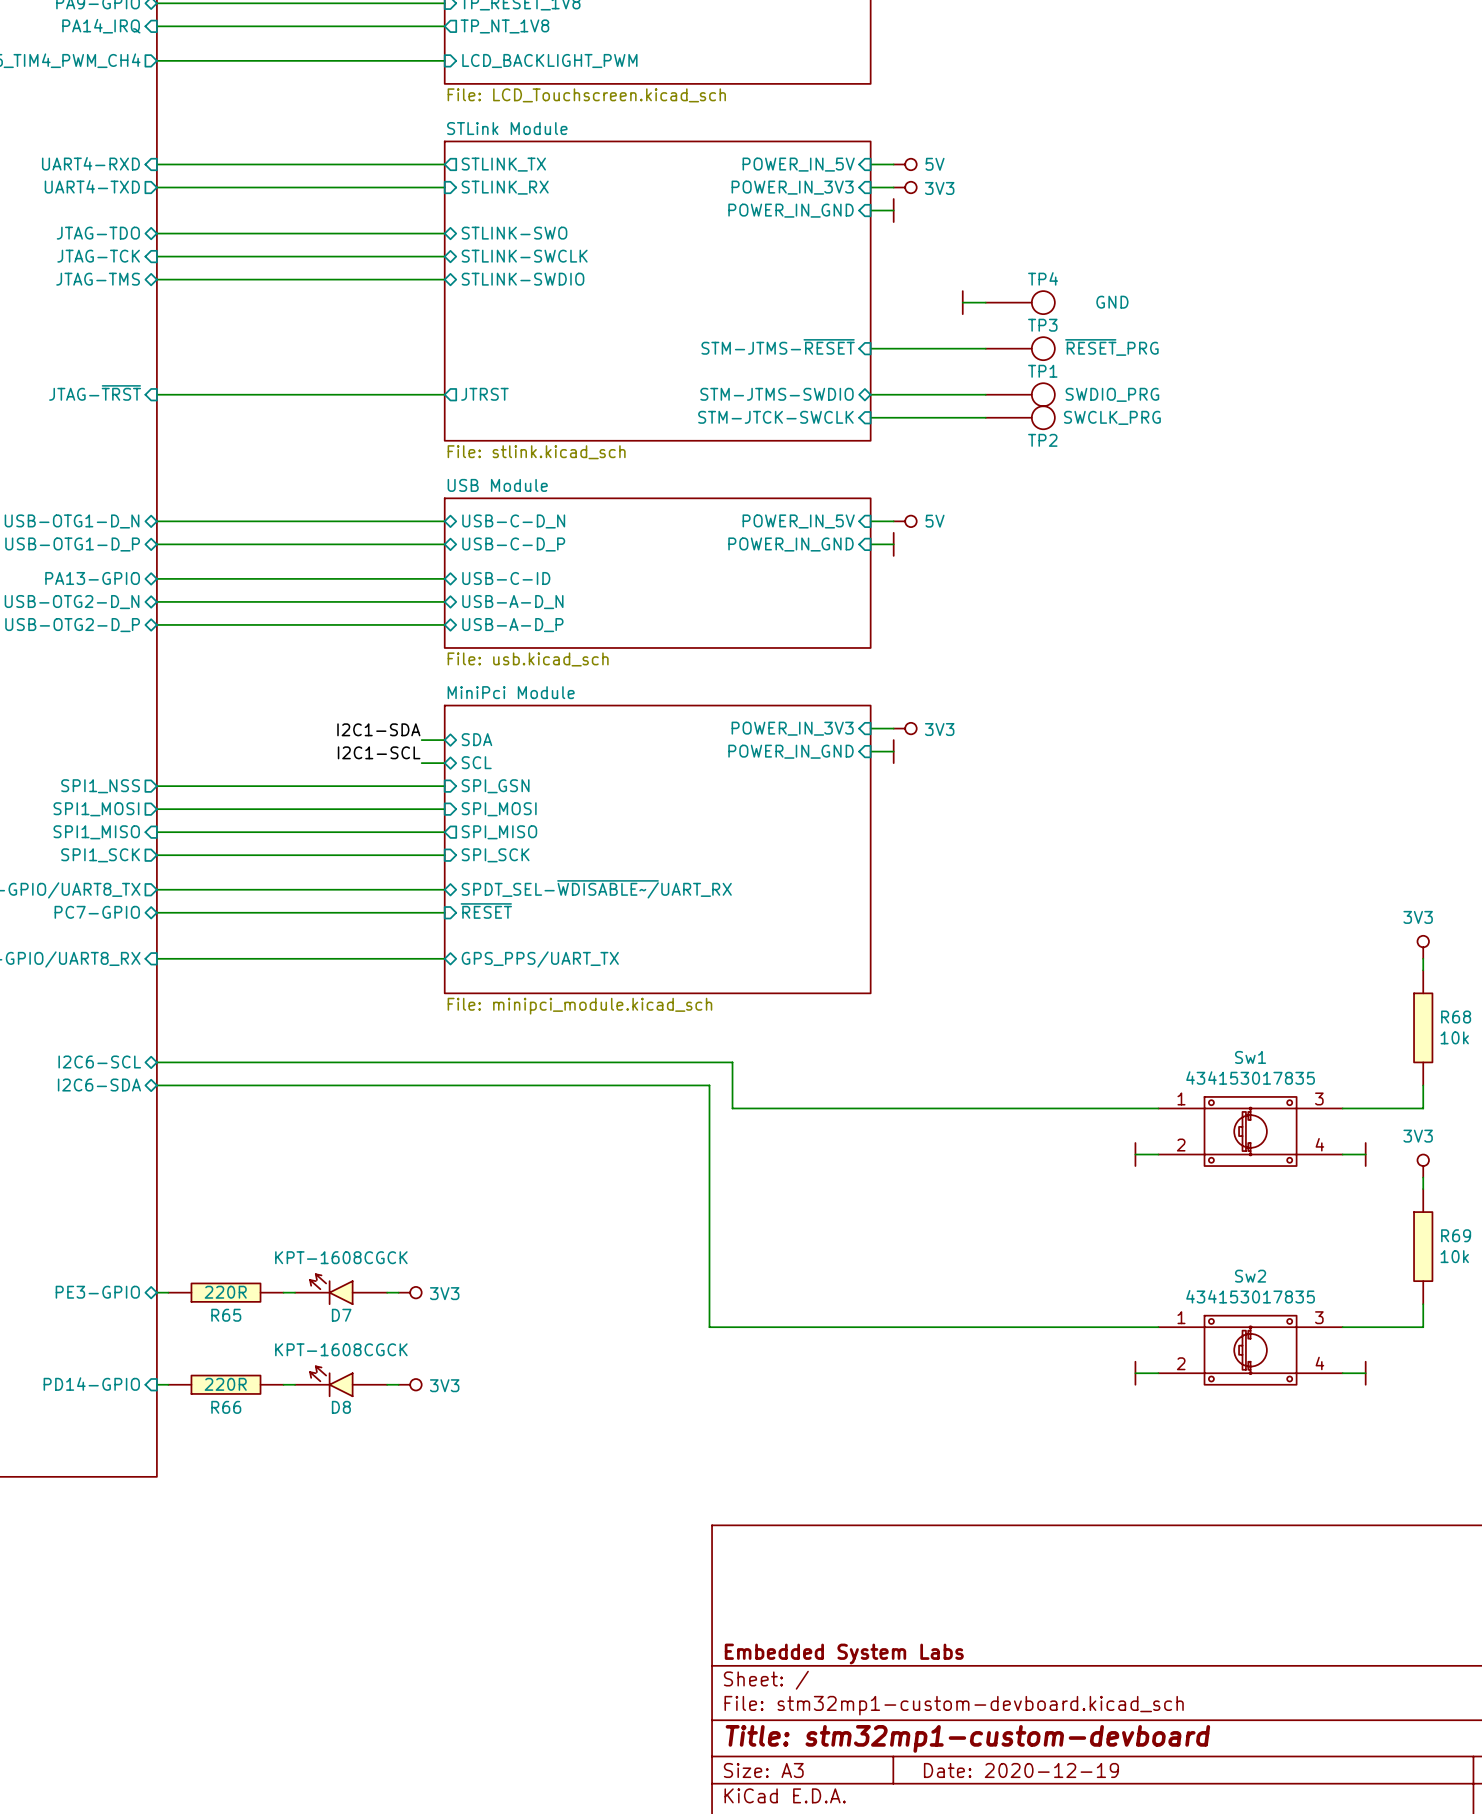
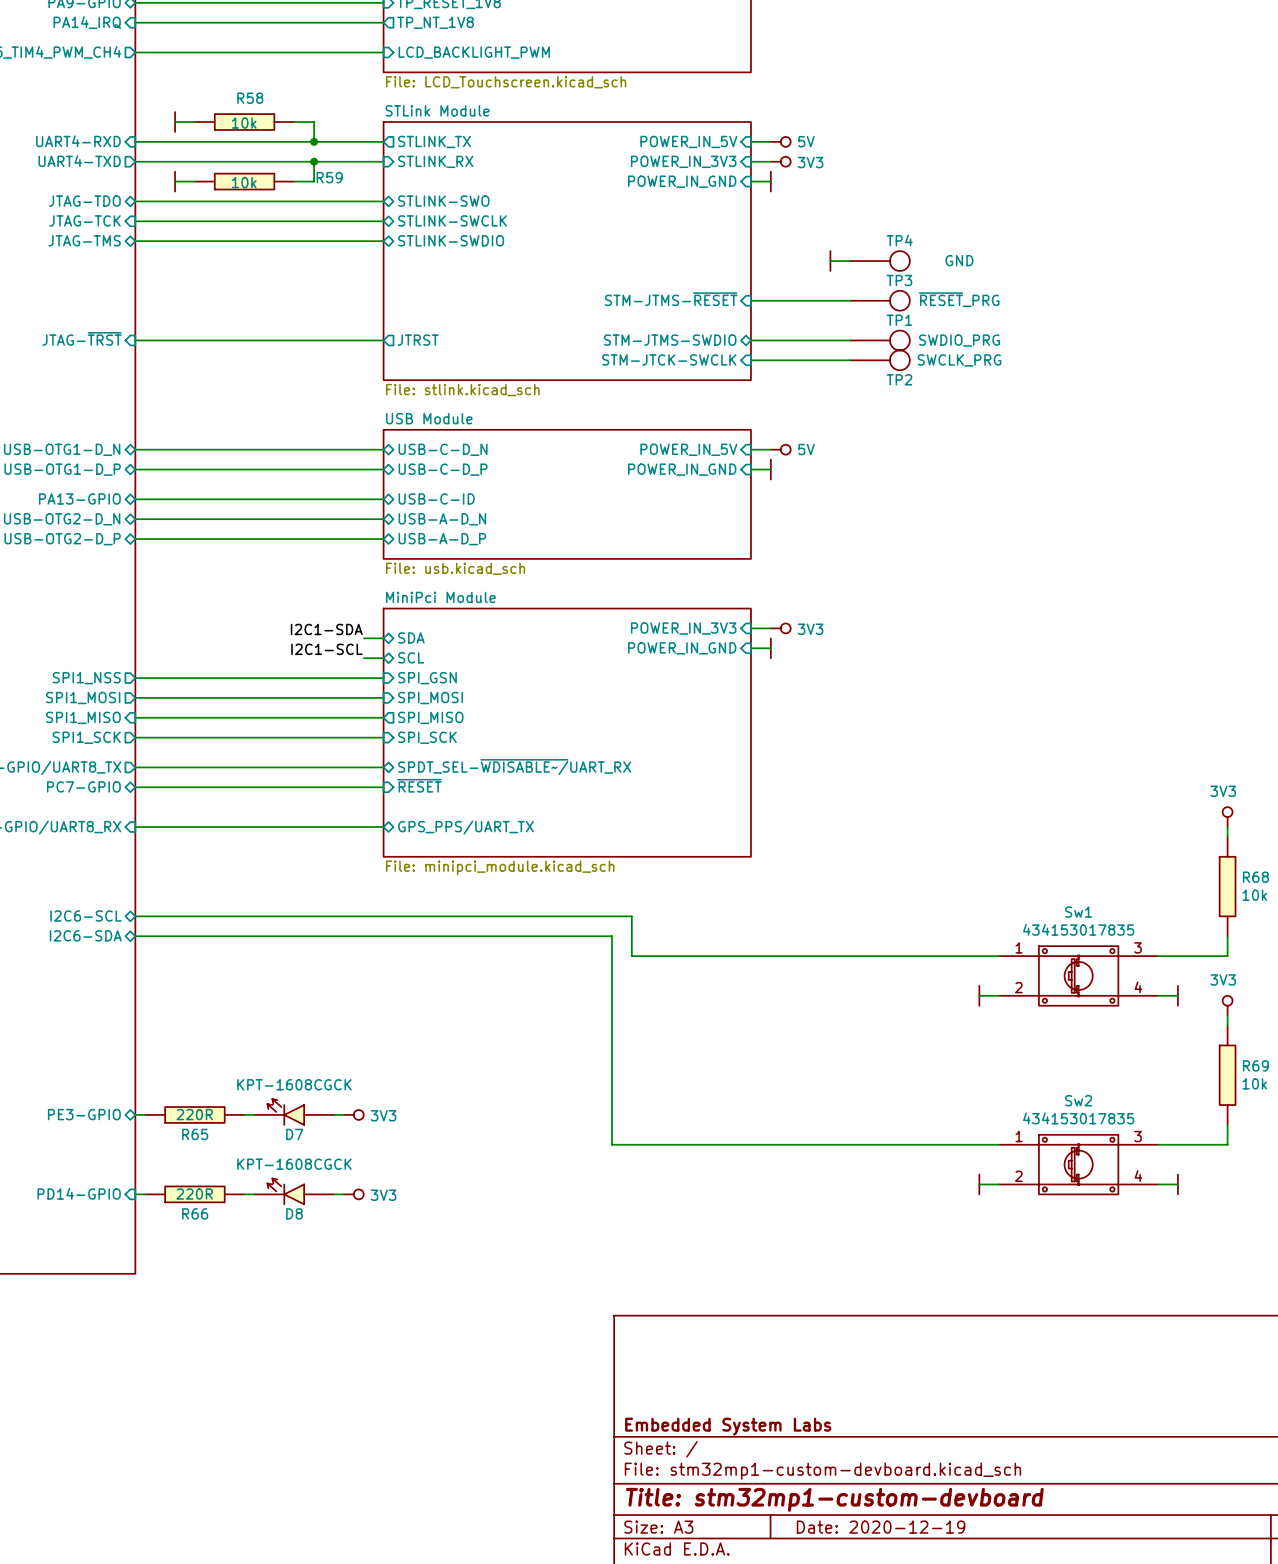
wire: none -> (175, 122) (194, 122)
power symbol: none -> (175, 122)
R58: none -> 10k (244, 122)
wire: none -> (294, 122) (314, 122) (314, 141)
junction: none -> (314, 141)
wire: none -> (314, 161) (314, 181) (294, 181)
junction: none -> (314, 161)
wire: none -> (175, 181) (194, 181)
power symbol: none -> (175, 181)
R59: none -> 10k (244, 181)

